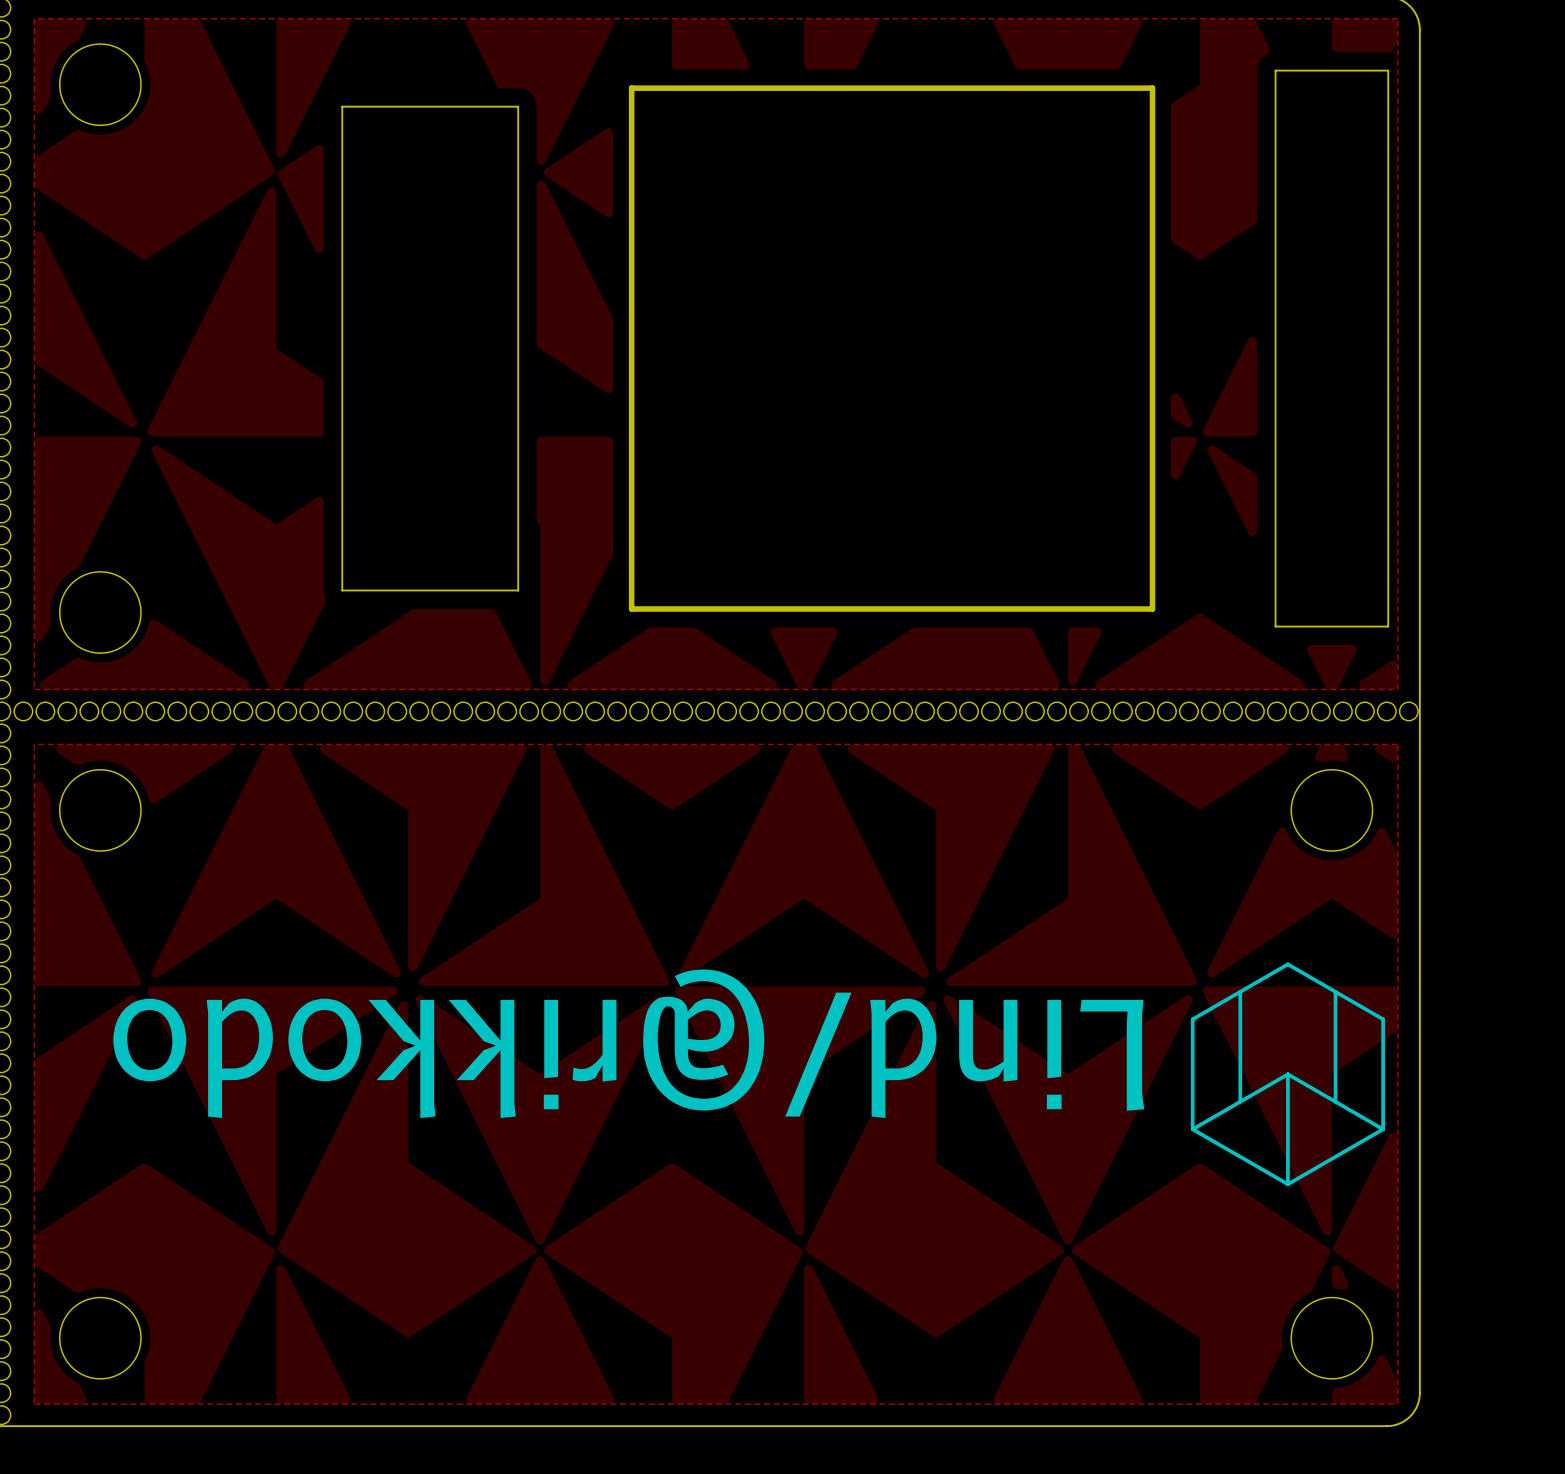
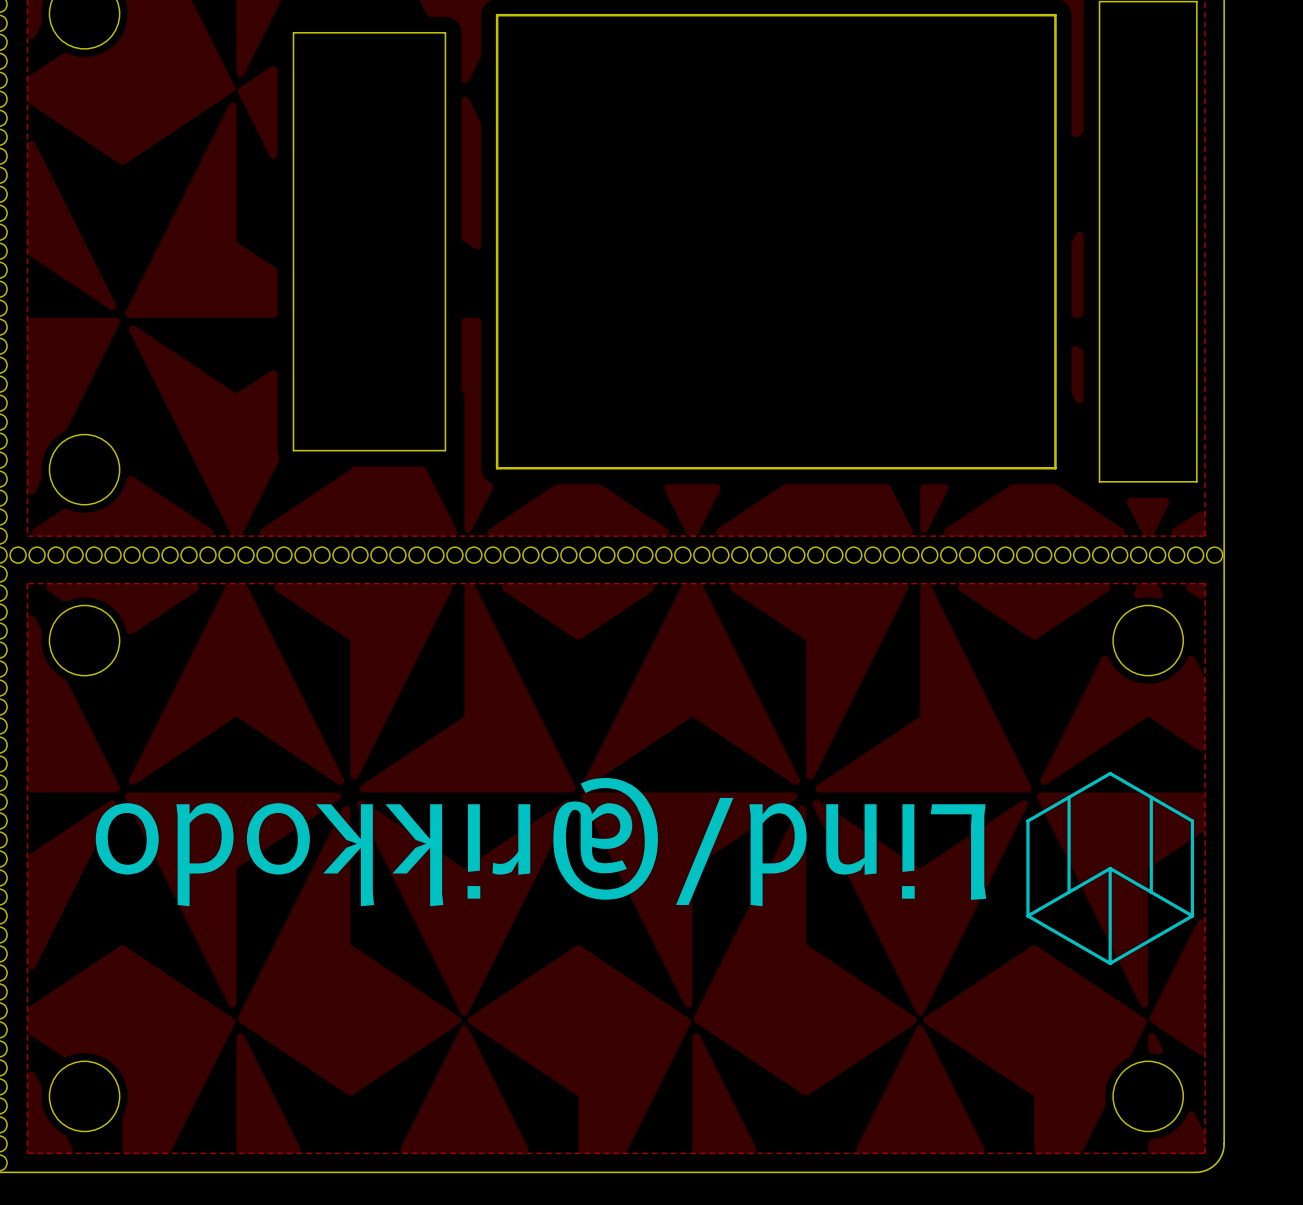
drawing shape: [628, 85, 1156, 612] -> [495, 13, 1057, 470]

